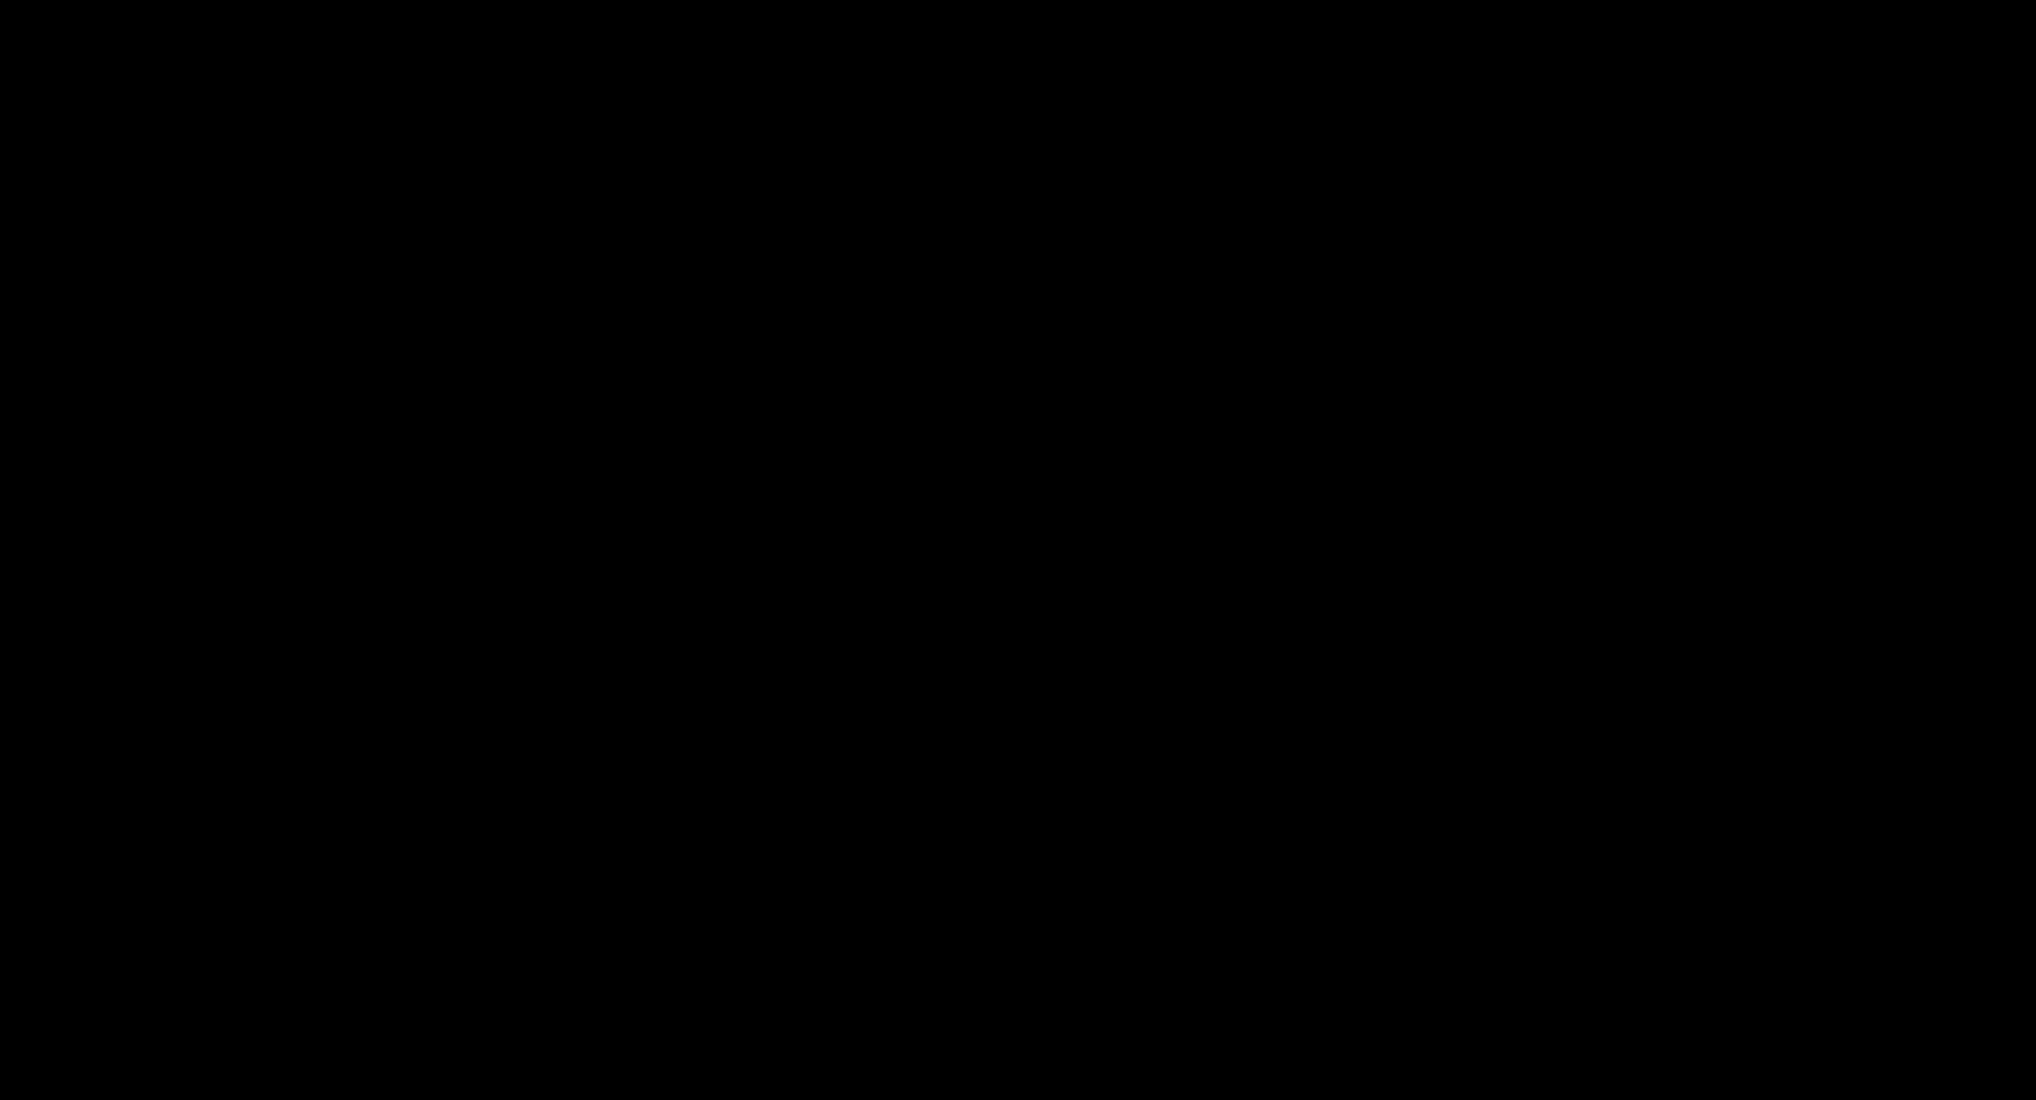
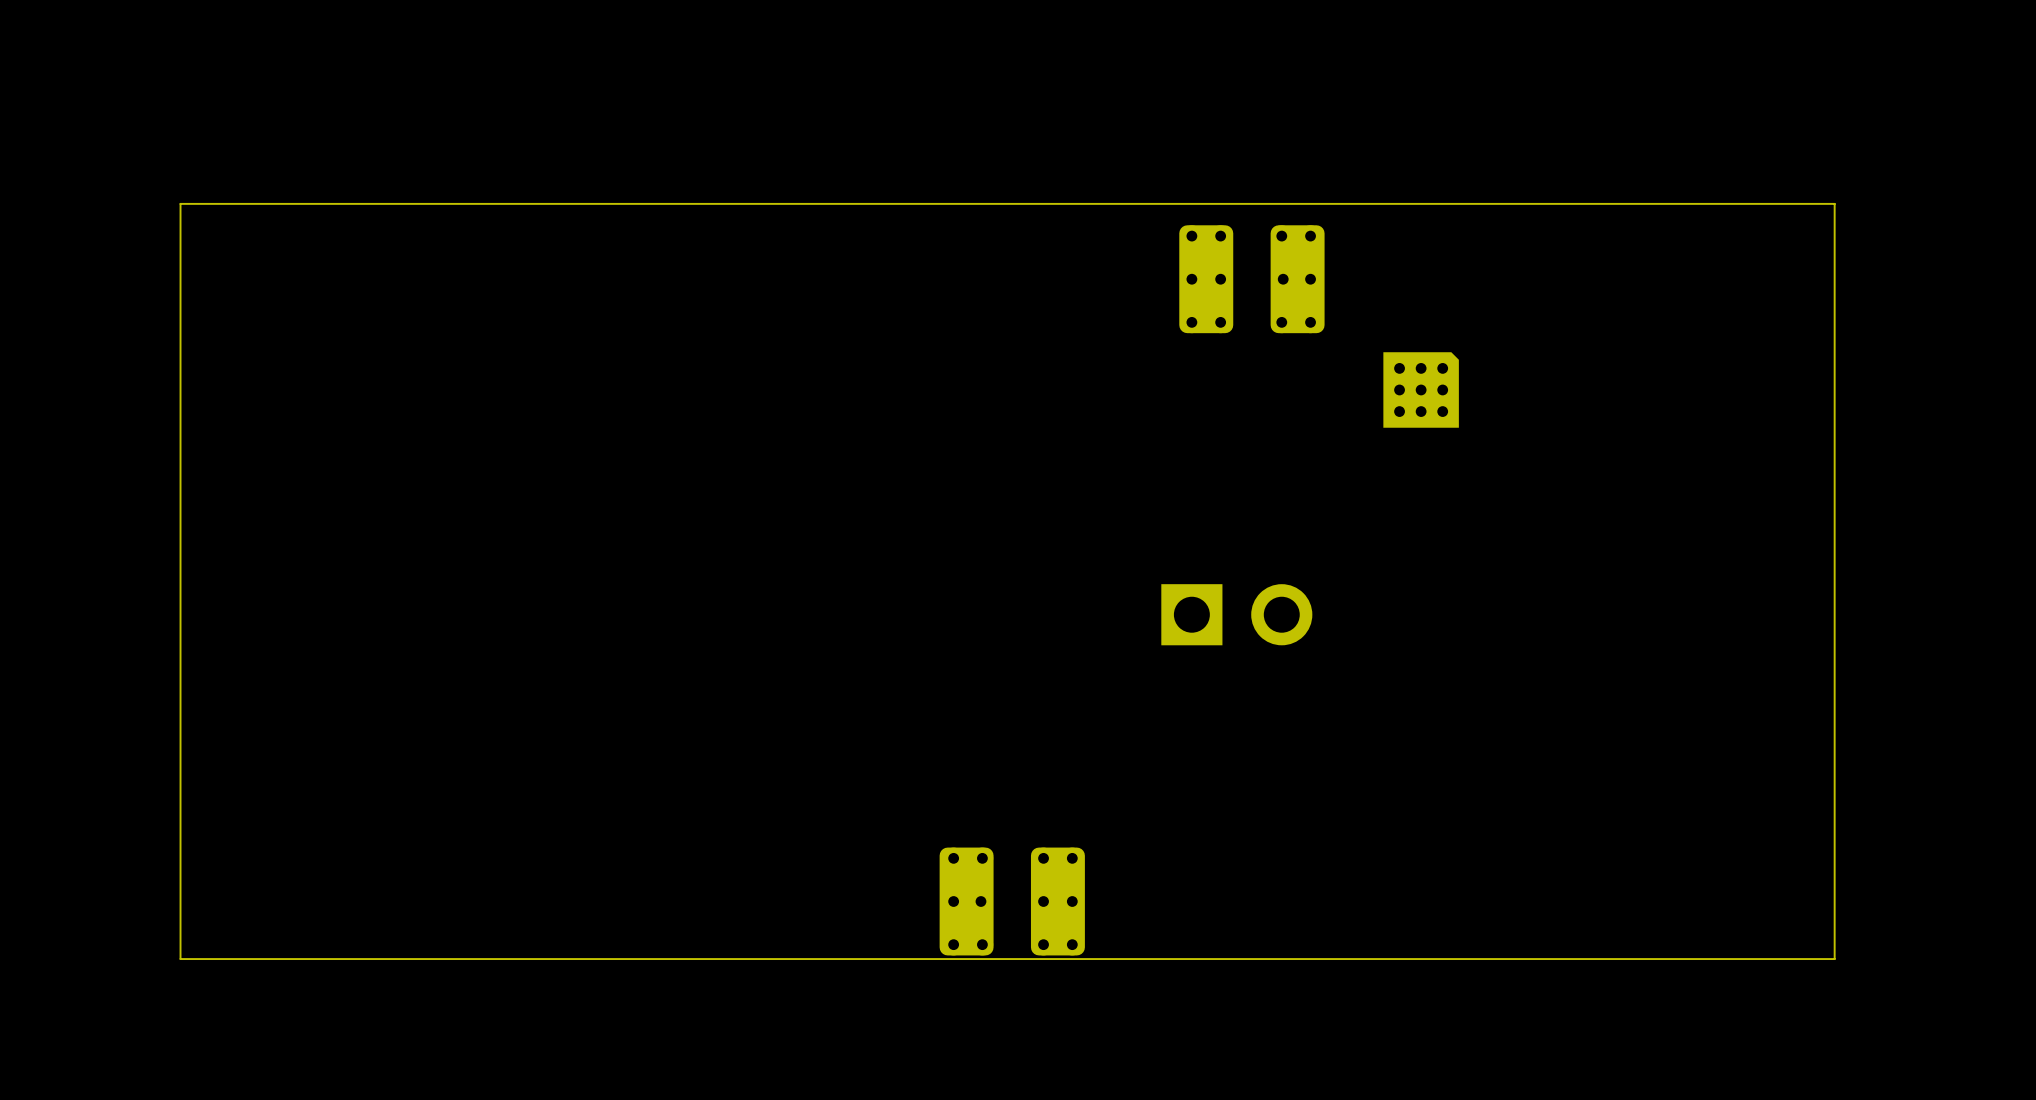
board edge: none -> (1834, 203) (180, 203) (180, 959) (1834, 959) (1834, 203)
part: none -> (1251, 279)
part: none -> (1421, 389)
part: none -> (1236, 614)
part: none -> (1012, 901)

